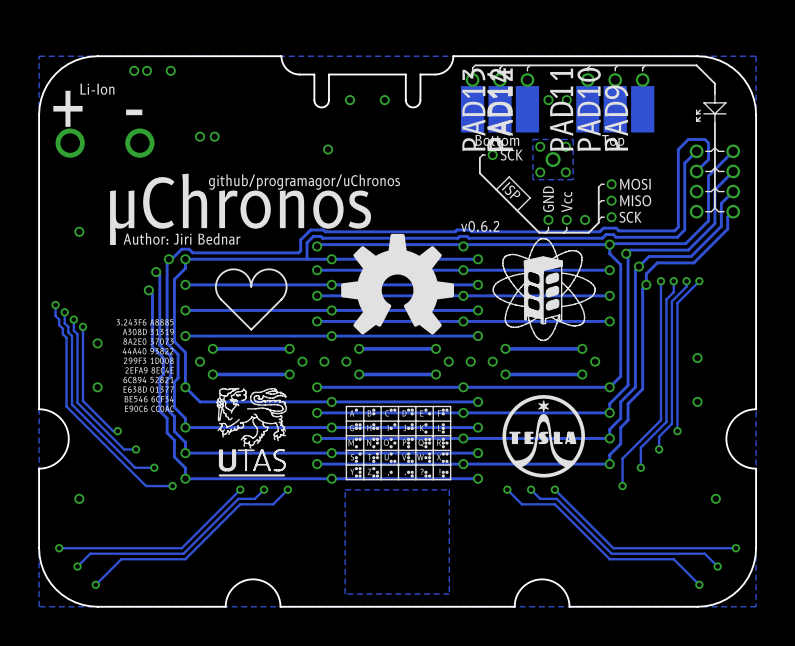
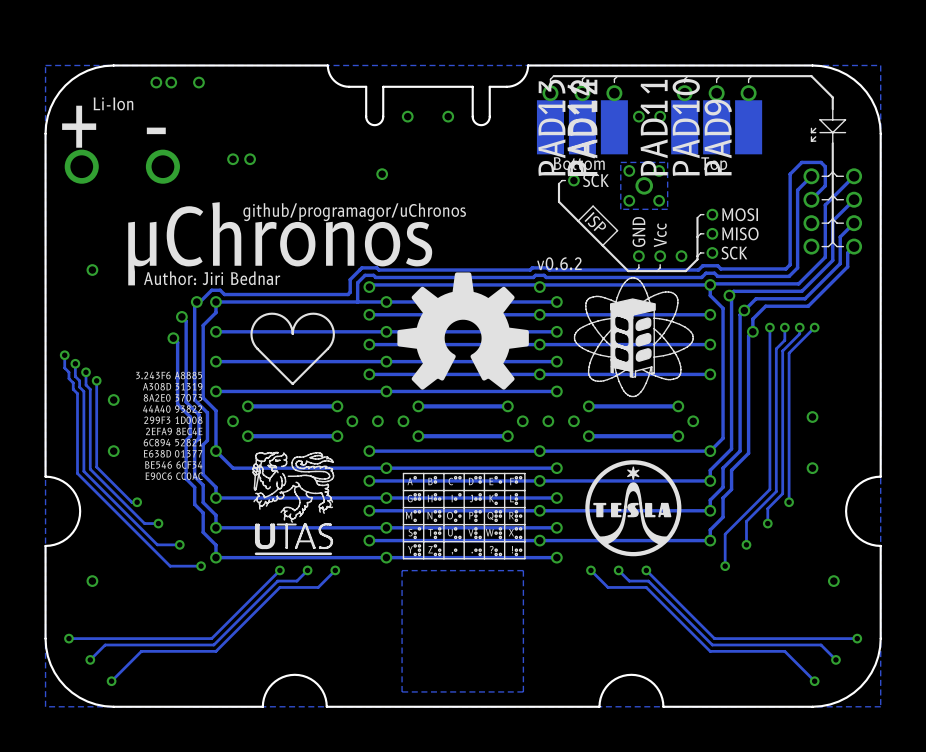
line: none -> (282, 473) (285, 481) (282, 485)
line: none -> (280, 476) (282, 483) (280, 488) (277, 486) (277, 482)

